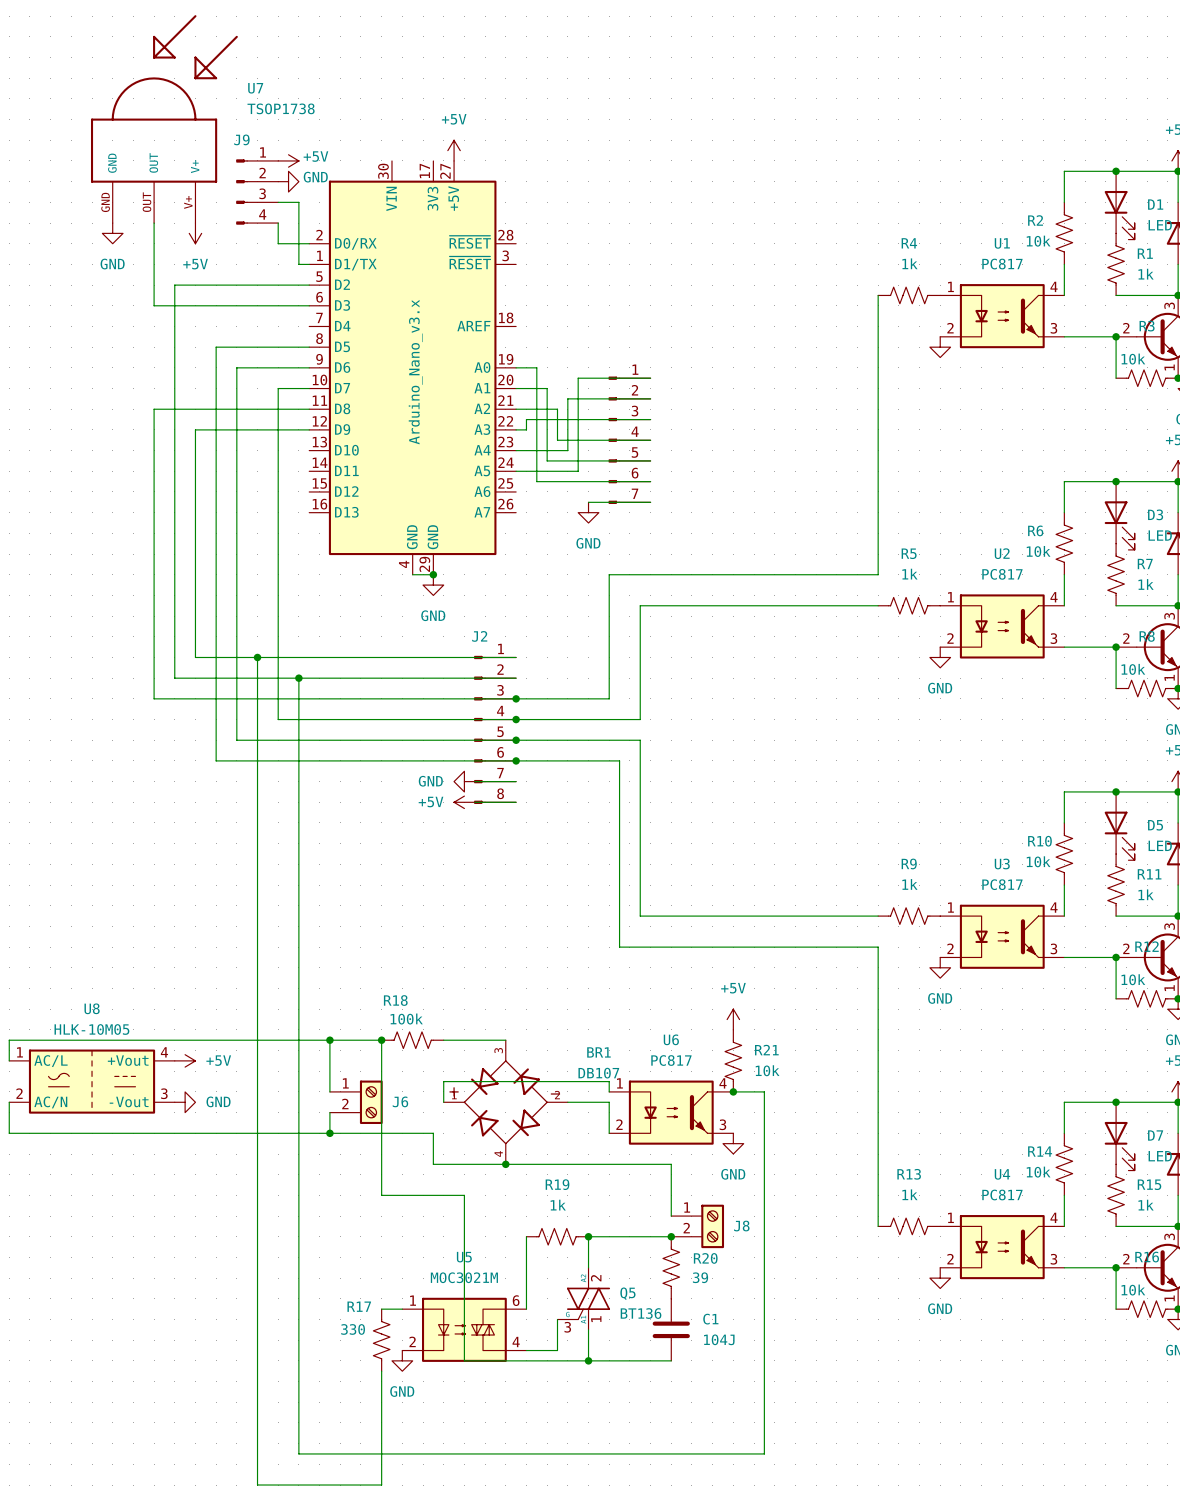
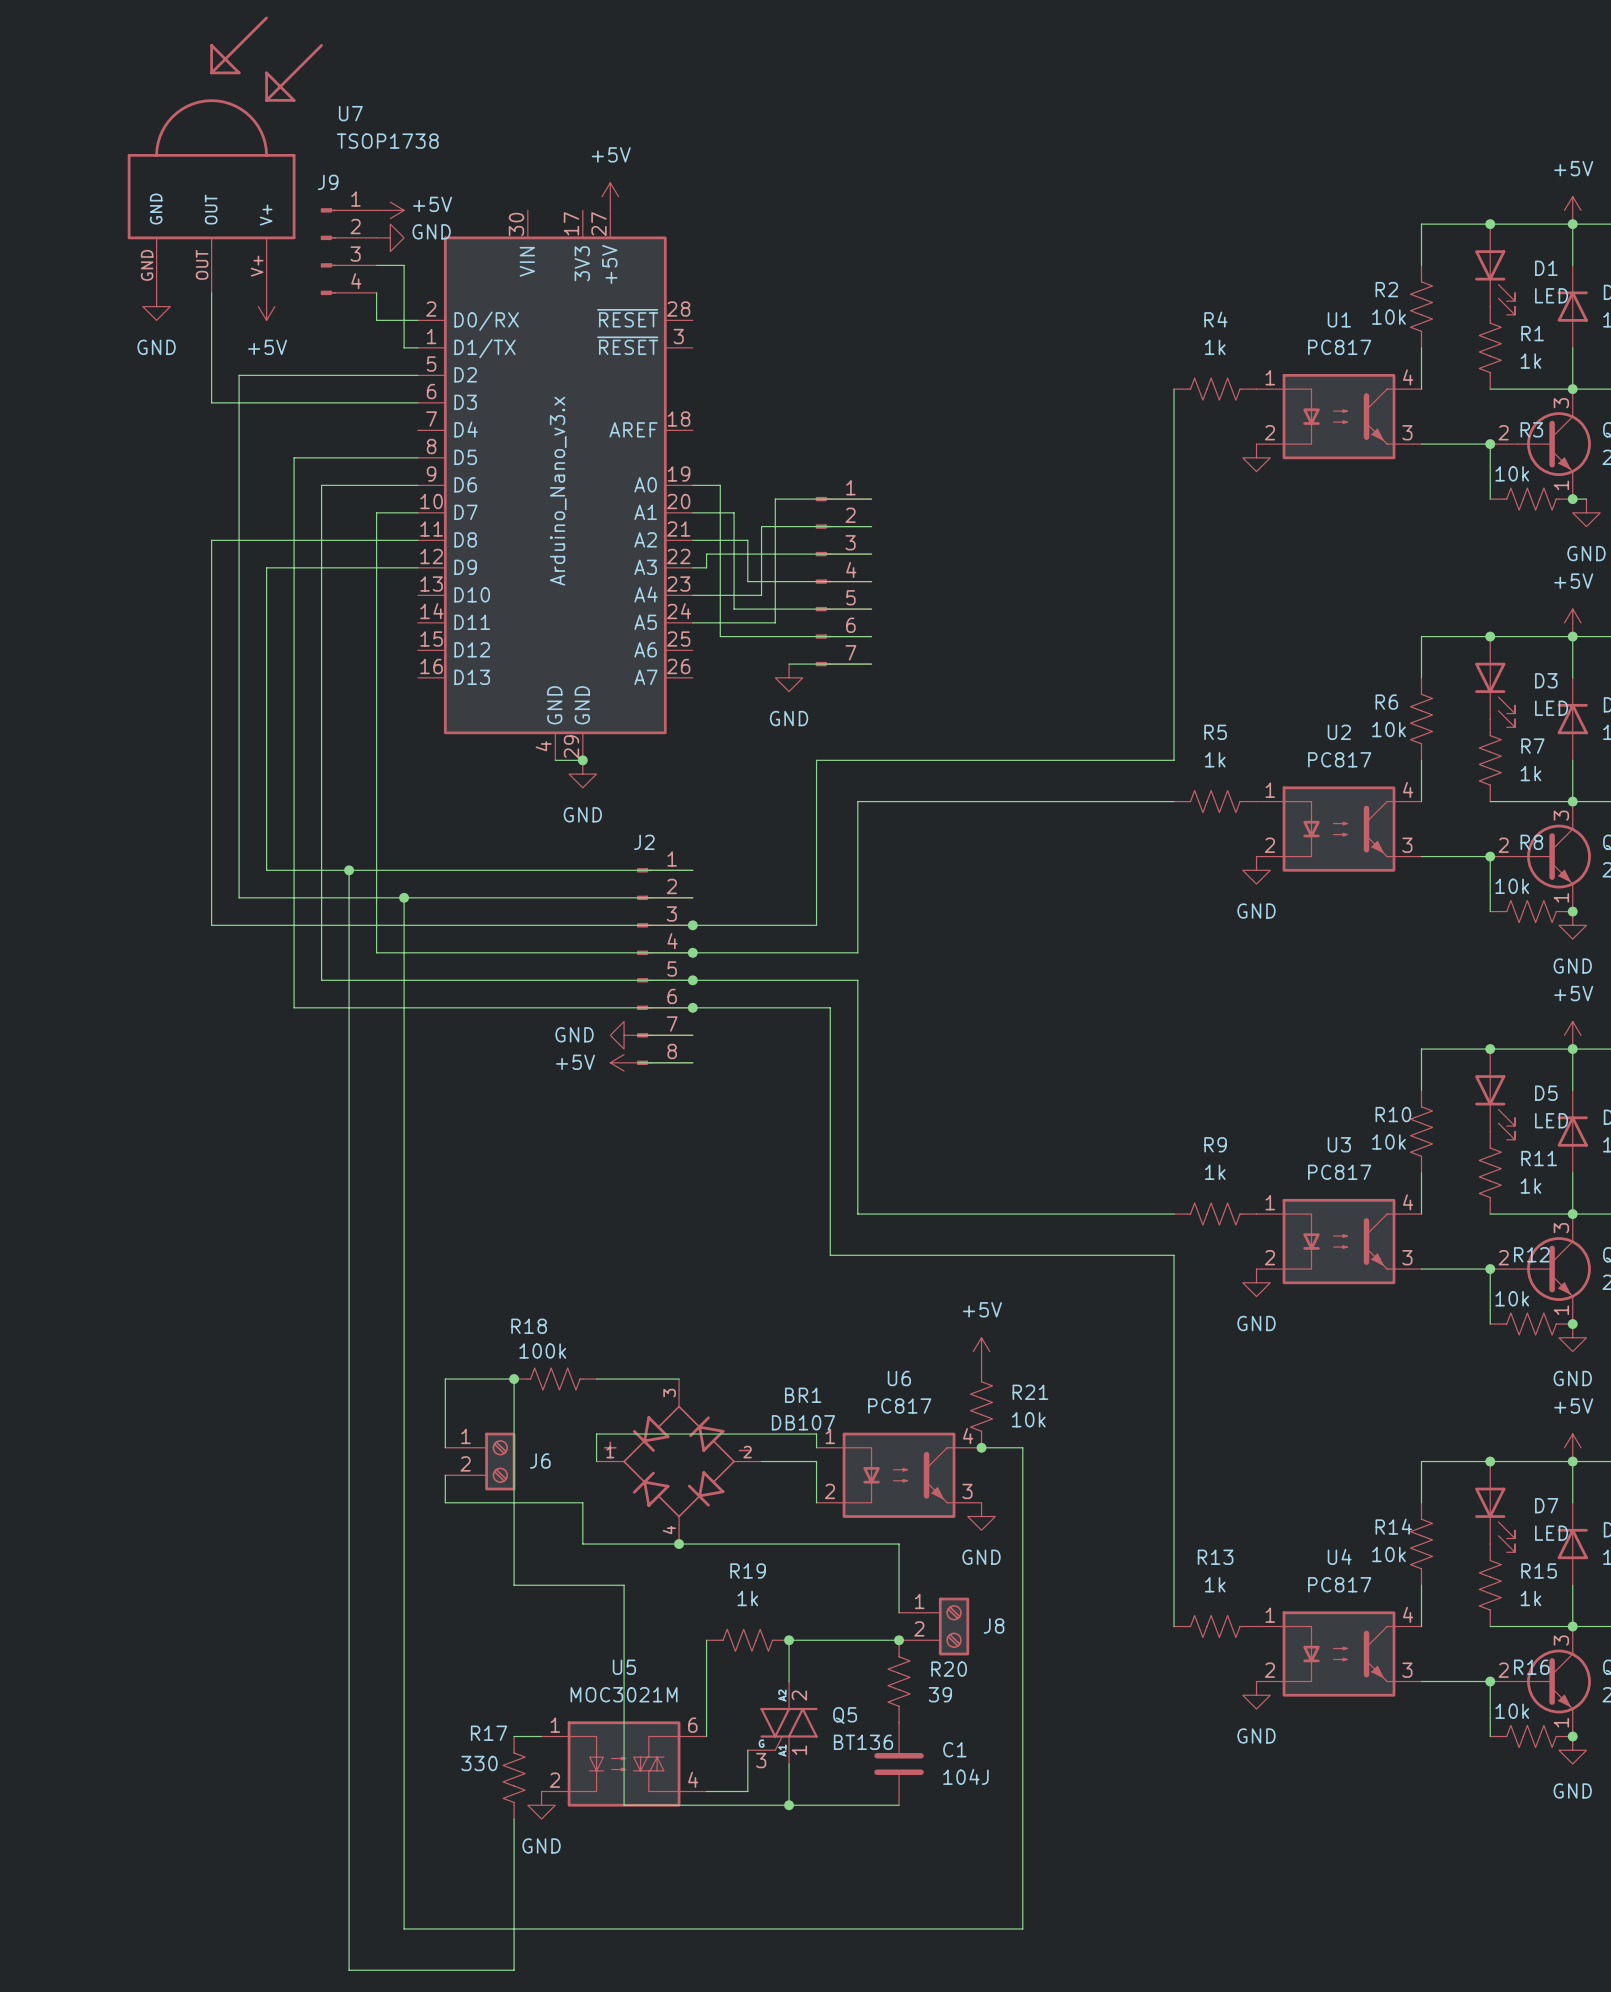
wire: (329, 1040) (9, 1040) (9, 1060) -> none
junction: (329, 1040) -> none
power symbol: +5V (185, 1060) -> none
U8: HLK-10M05 (92, 1081) -> none
wire: (9, 1102) (9, 1133) (329, 1133) -> none
power symbol: GND (185, 1102) -> none
junction: (329, 1133) -> none

